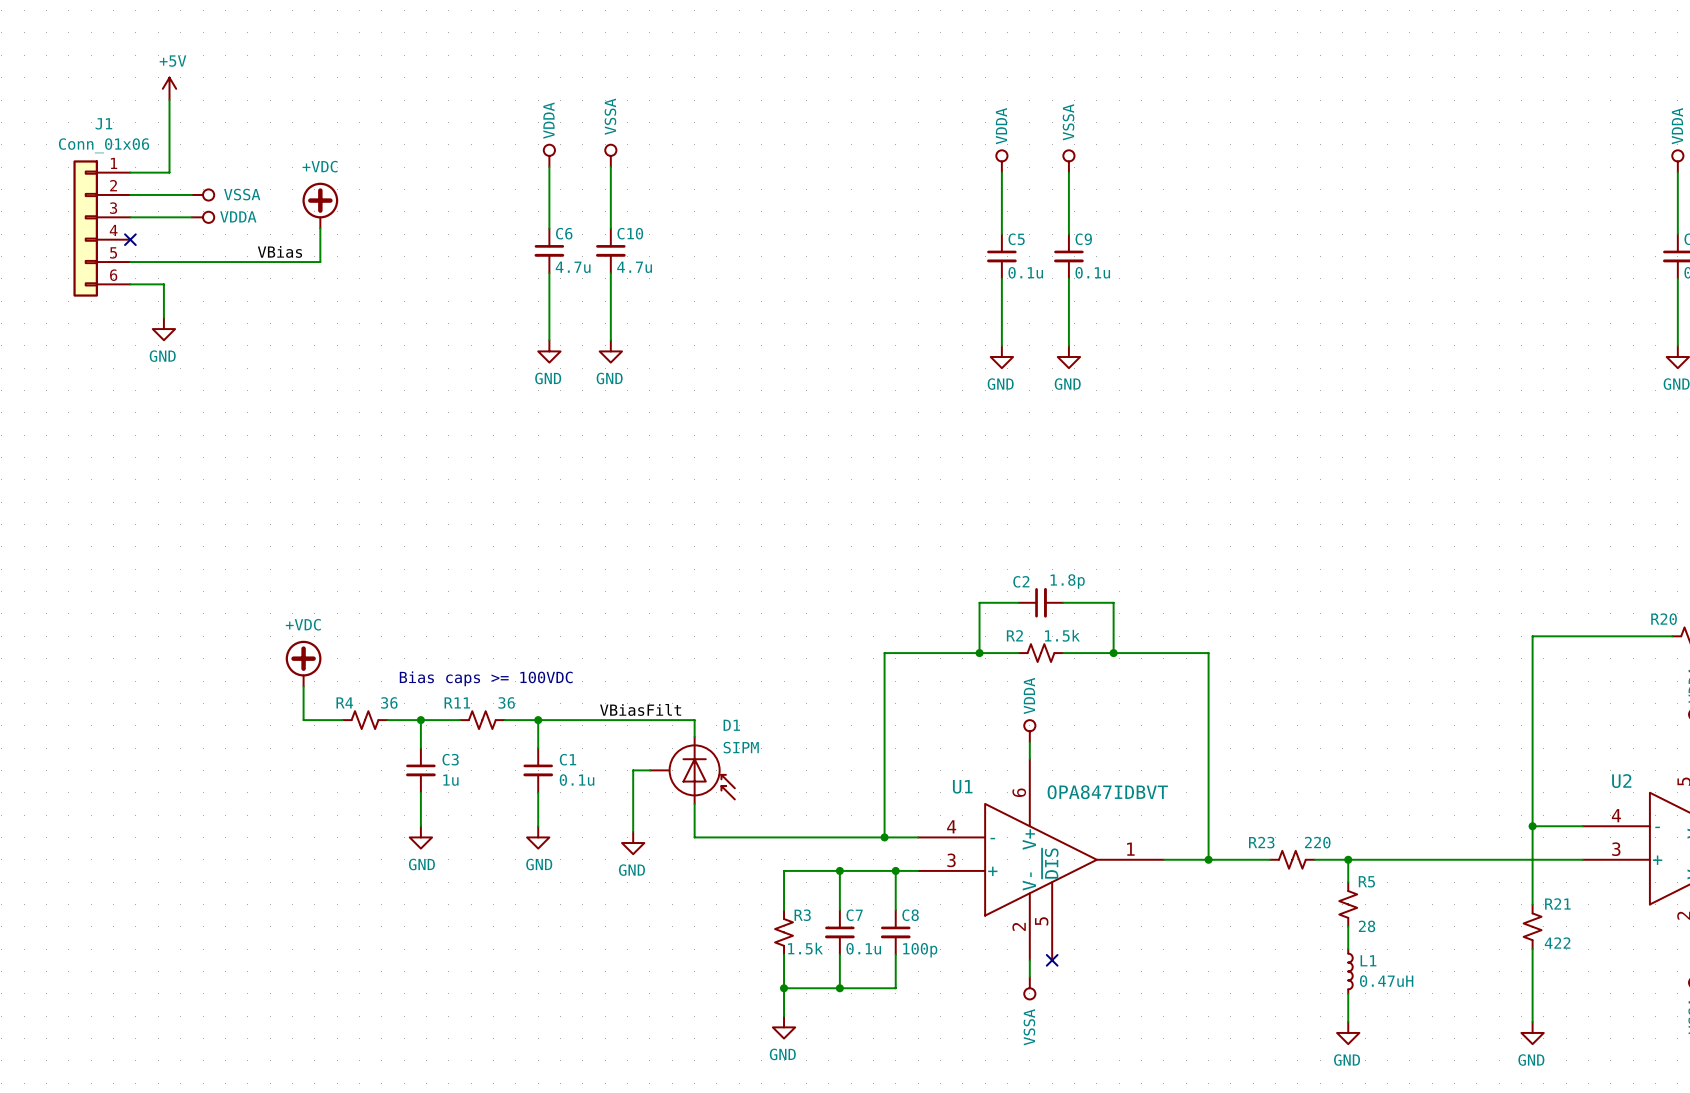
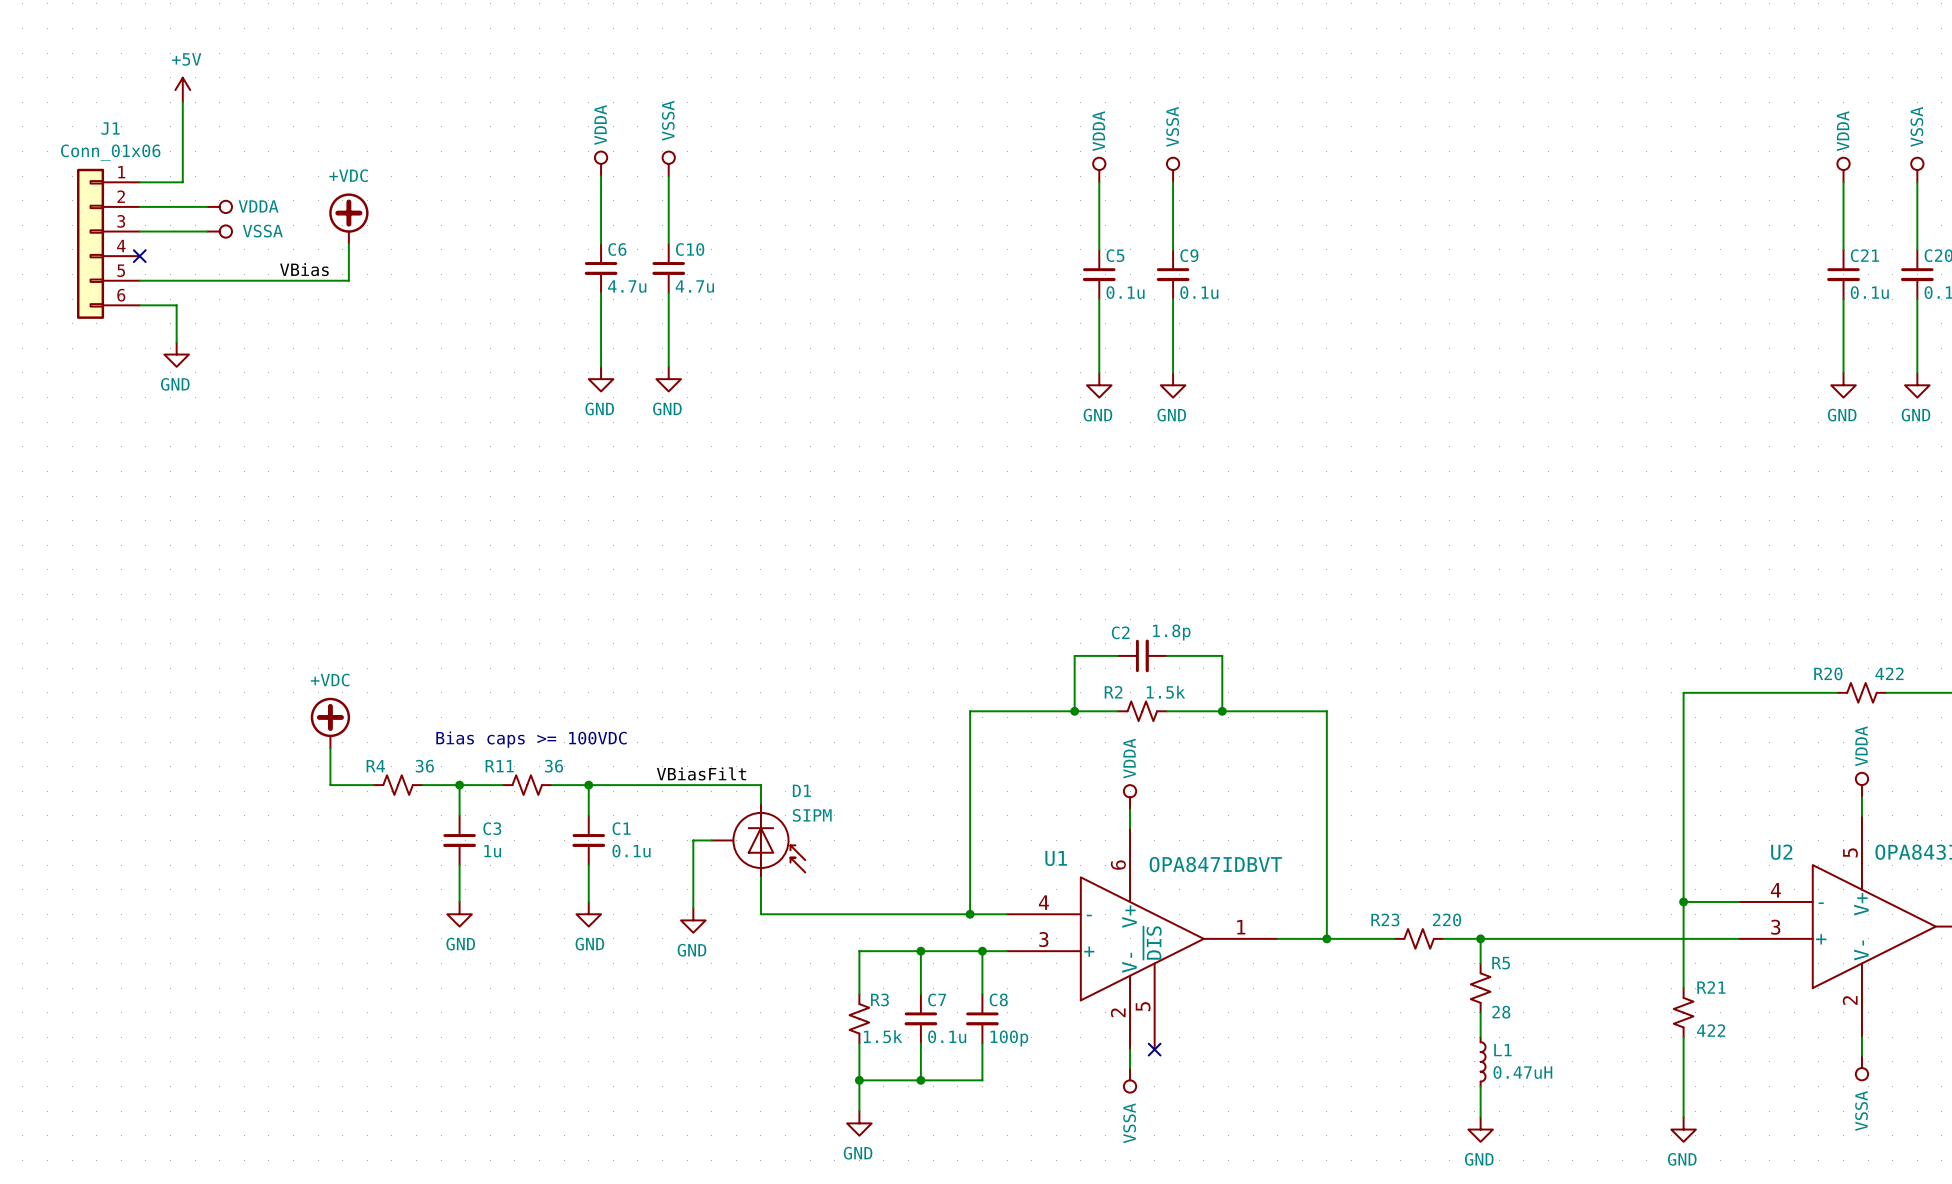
power symbol: VSSA (203, 194) -> VDDA (219, 206)
power symbol: VDDA (203, 217) -> VSSA (219, 231)

